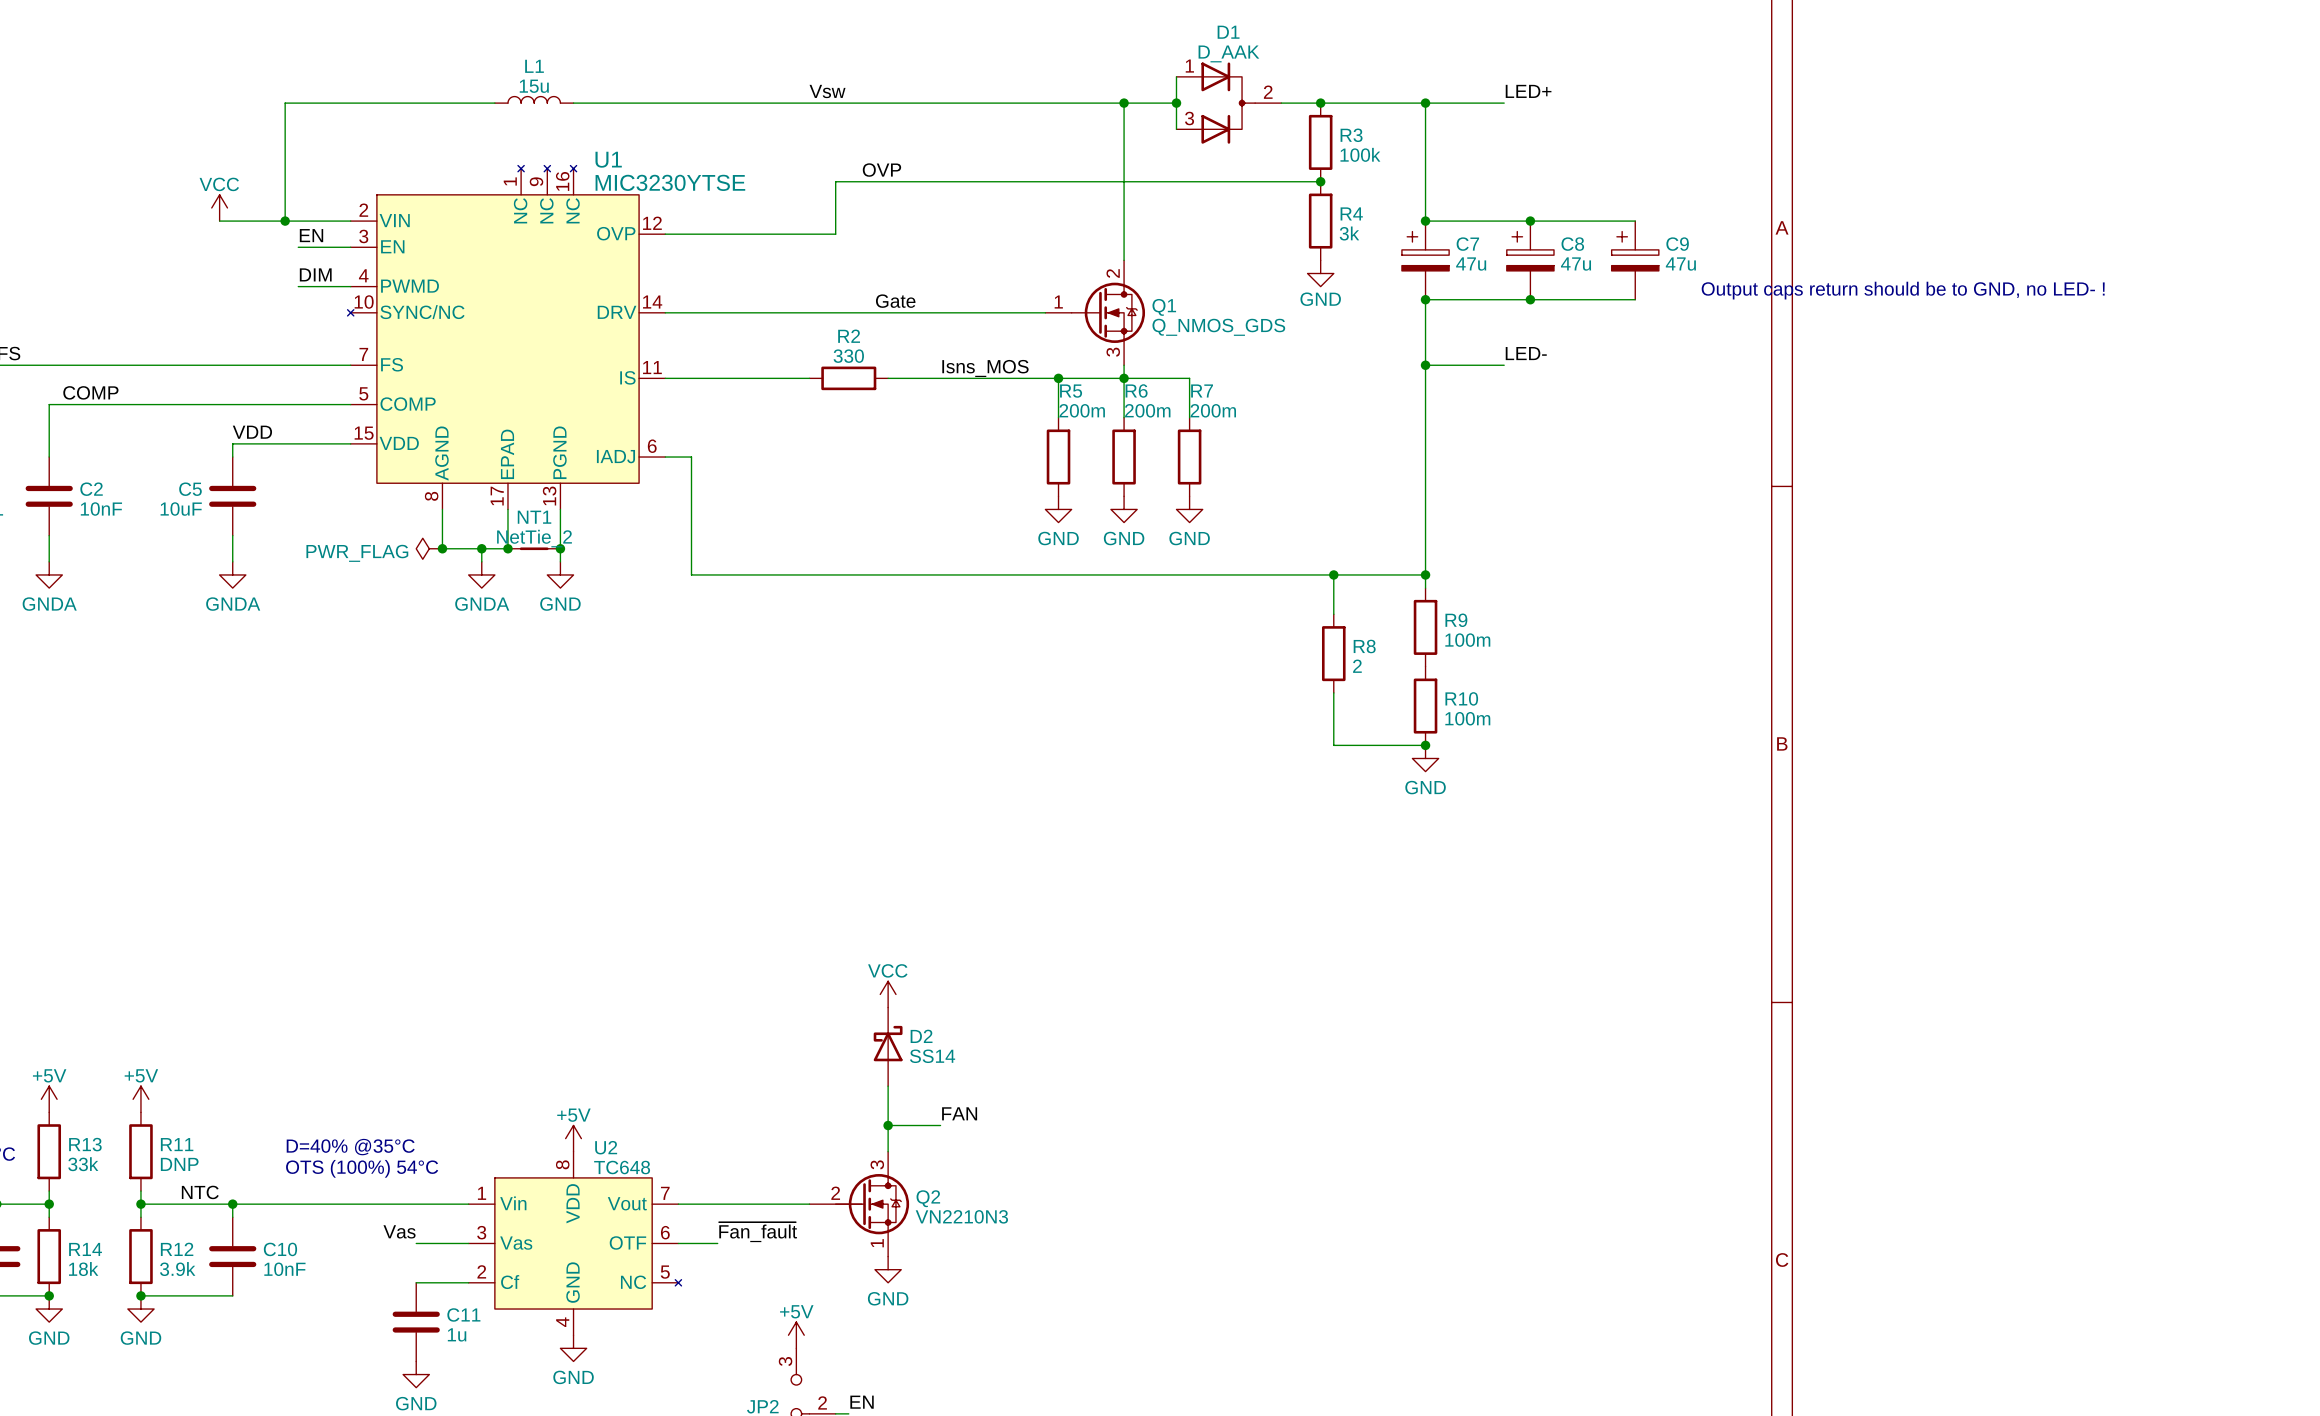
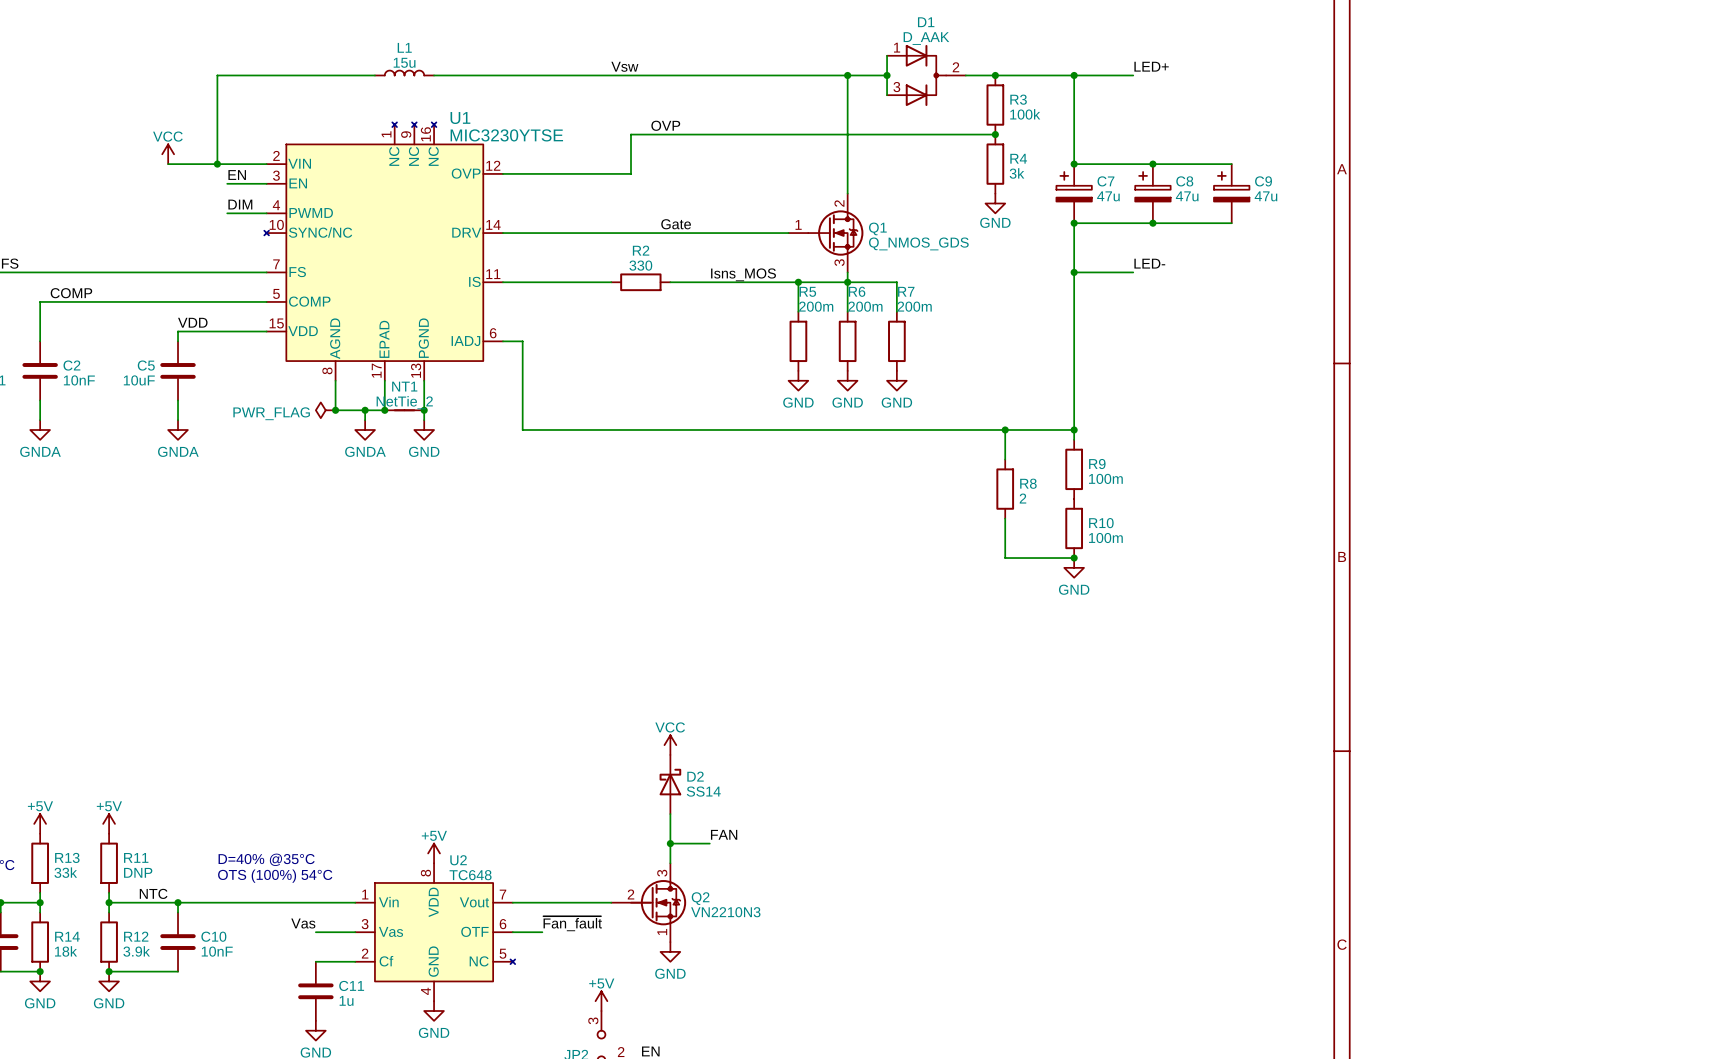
text: Output caps return should be to GND, no LED- ! (1903, 290) -> none

